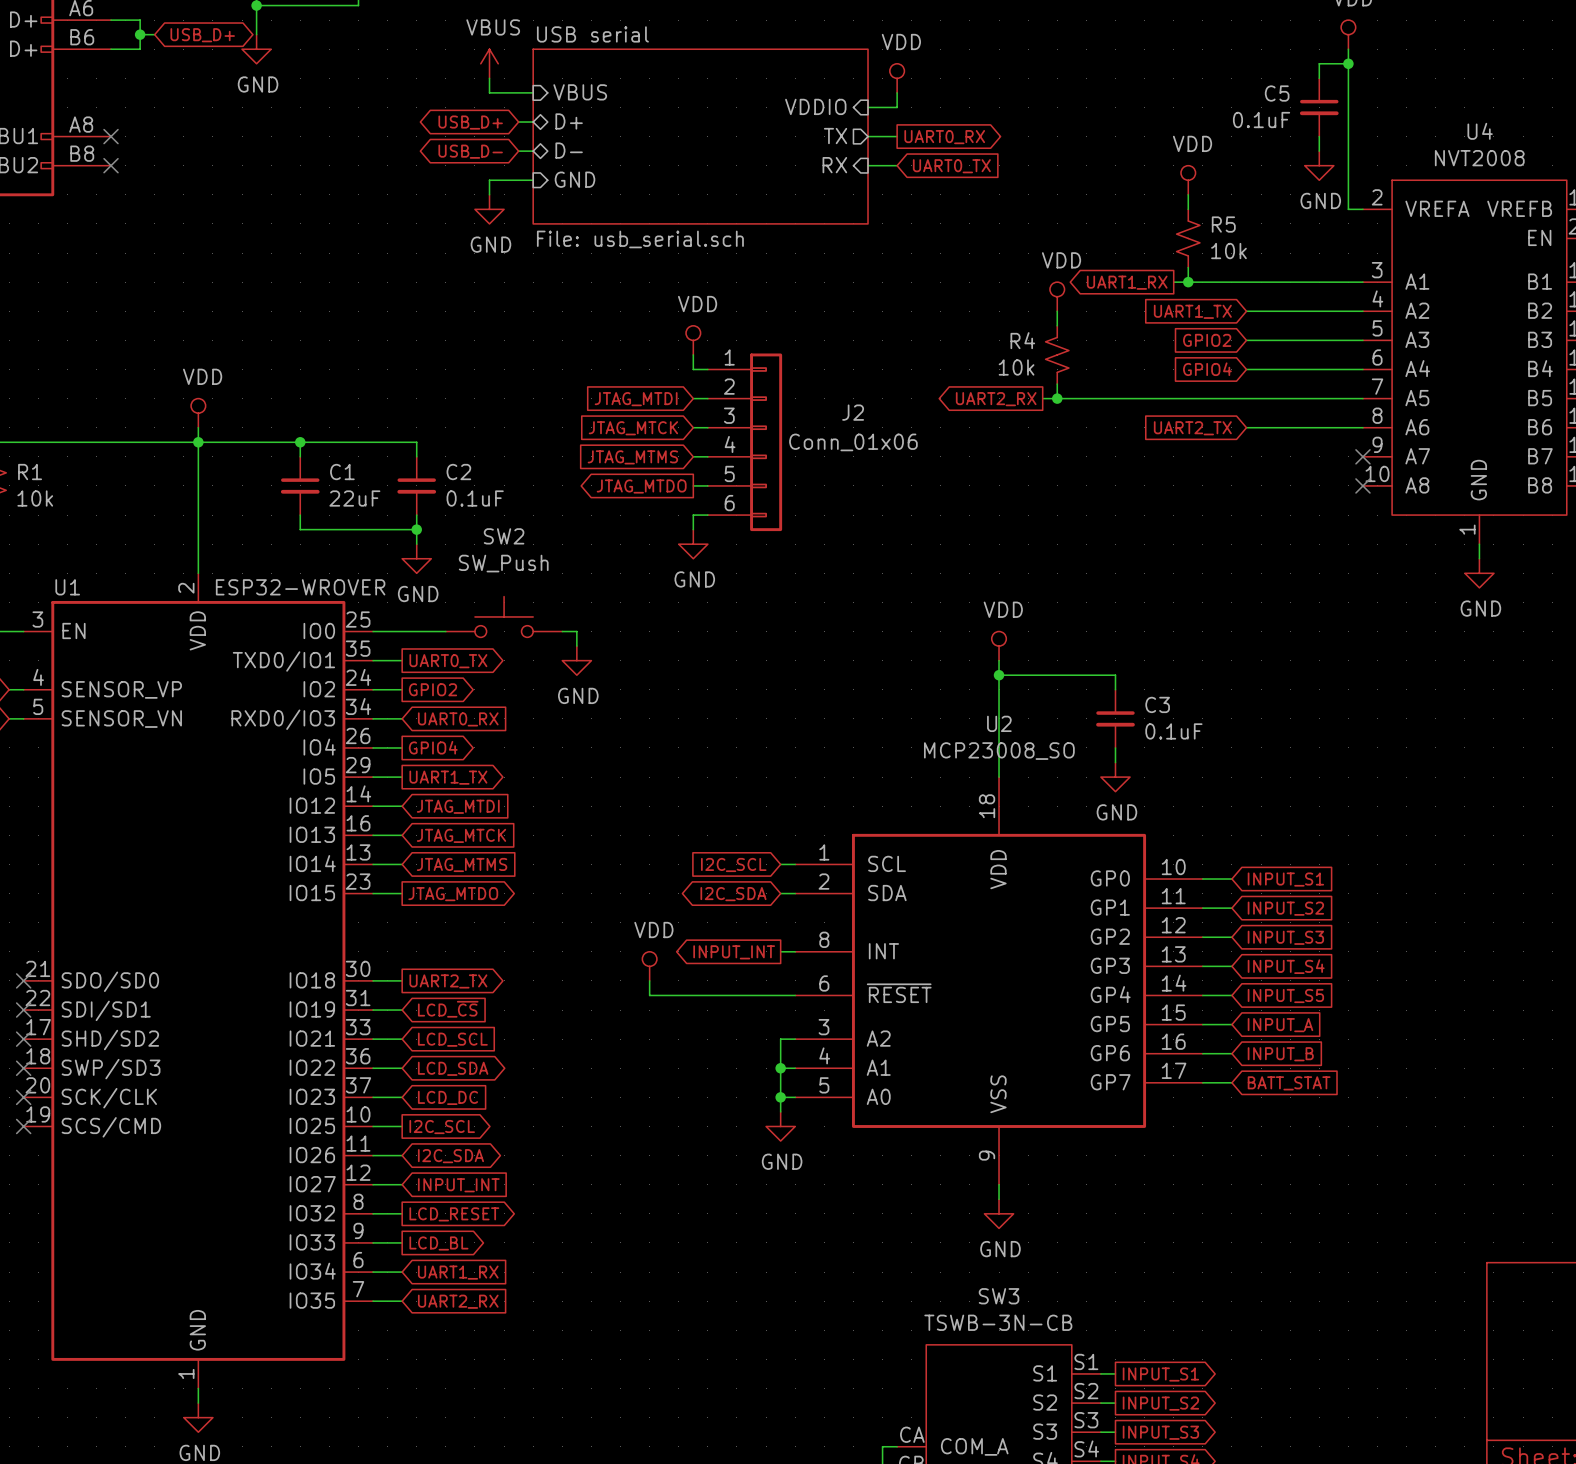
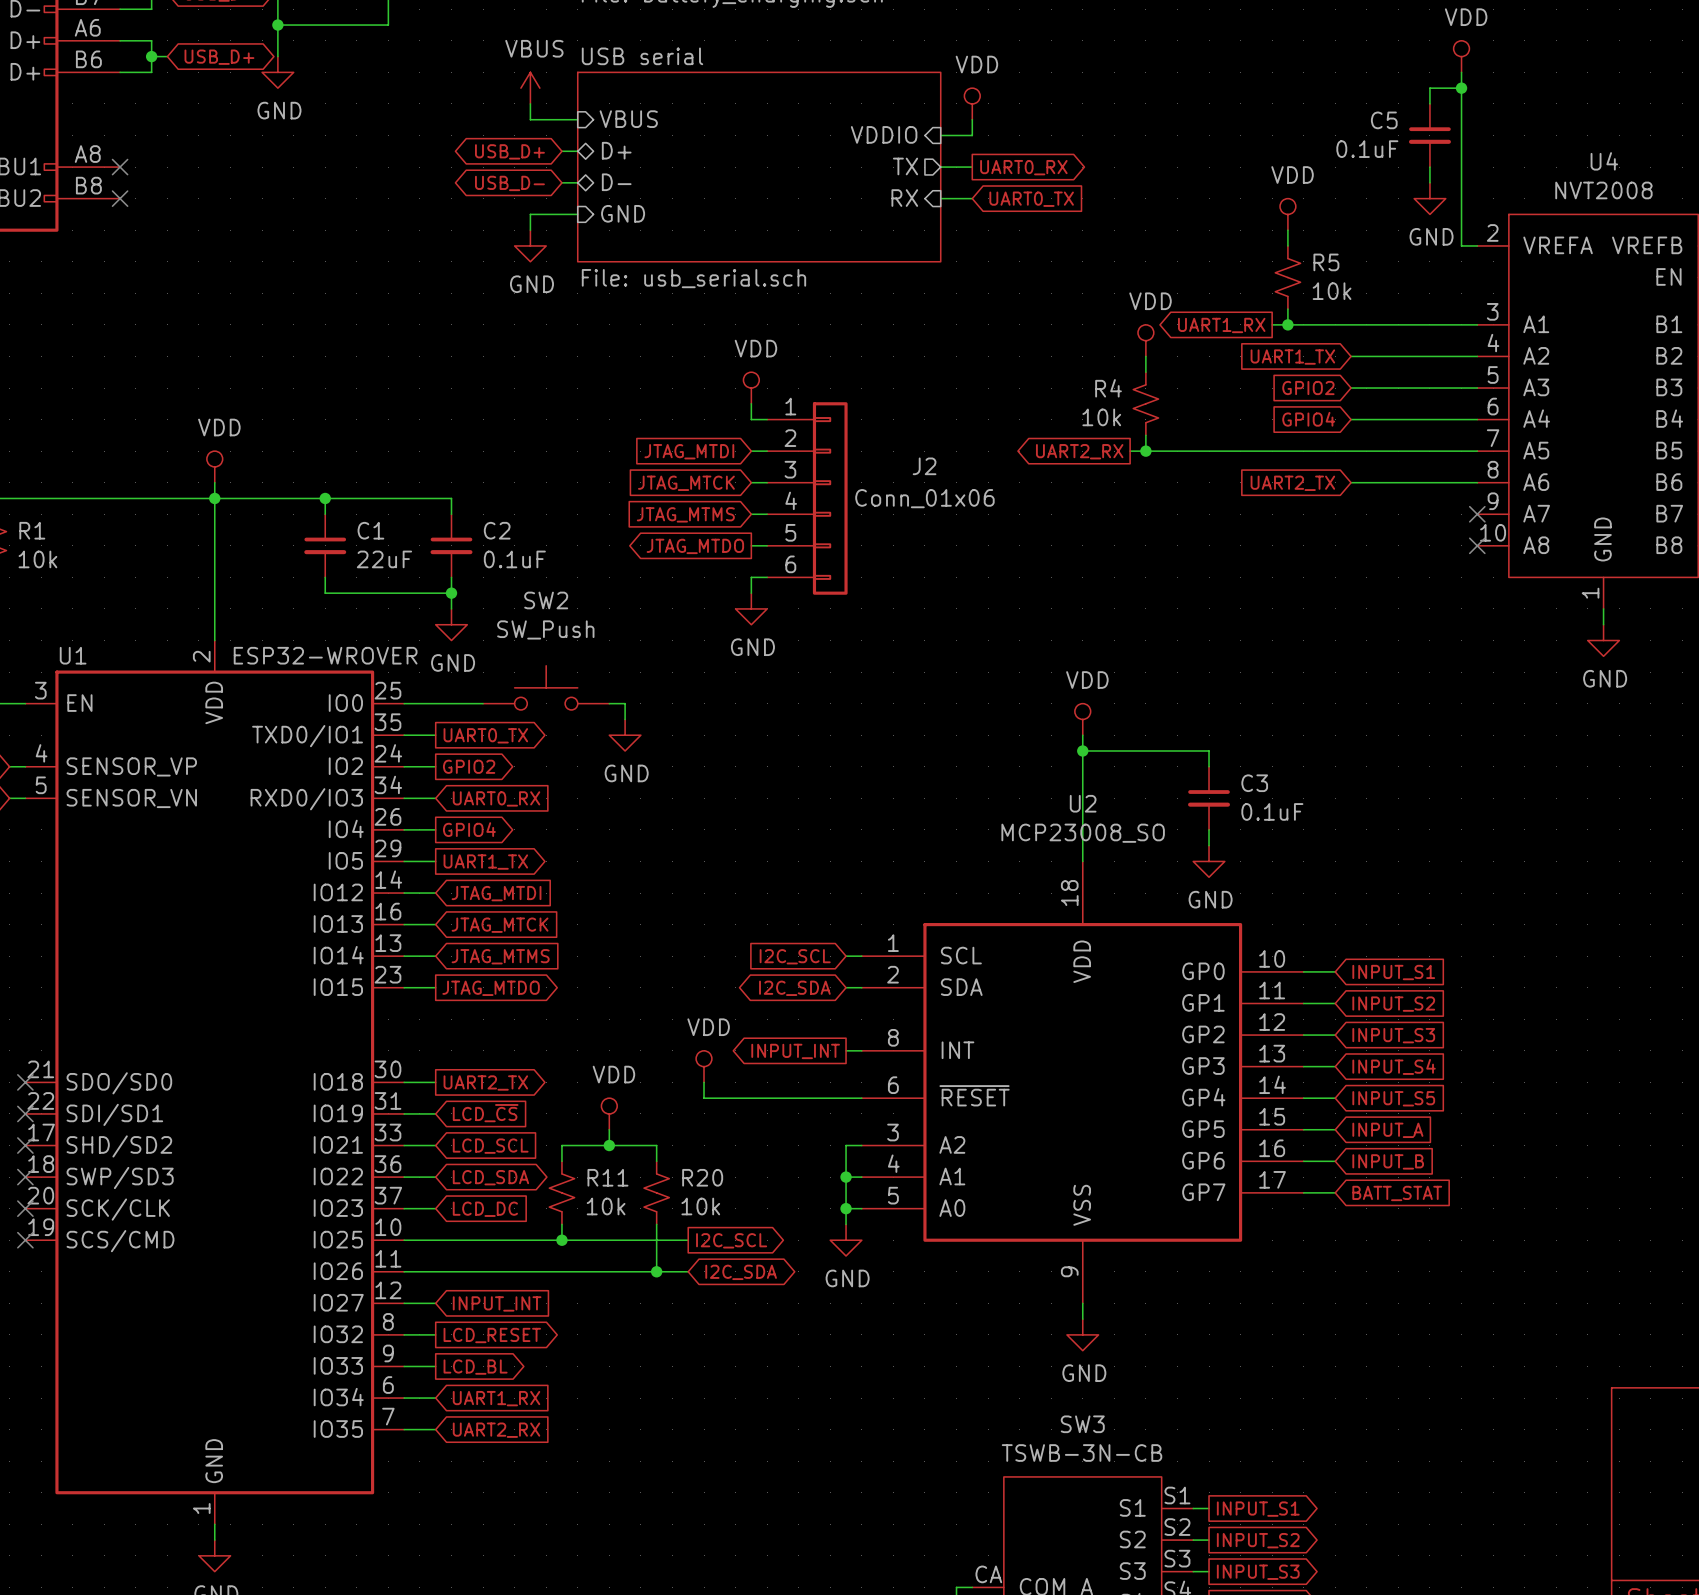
power symbol: none -> VDD (609, 1113)
wire: none -> (609, 1129) (609, 1145)
junction: none -> (609, 1145)
wire: none -> (561, 1161) (561, 1145) (656, 1145) (656, 1161)
R11: none -> 10k (561, 1192)
R20: none -> 10k (656, 1192)
wire: none -> (561, 1224) (561, 1240)
wire: none -> (656, 1224) (656, 1271)
wire: none -> (435, 1240) (688, 1240)
junction: none -> (561, 1240)
global label position: I2C_SCL (442, 1127) -> I2C_SCL (731, 1240)
wire: none -> (435, 1271) (688, 1271)
junction: none -> (656, 1271)
global label position: I2C_SDA (450, 1156) -> I2C_SDA (741, 1272)

